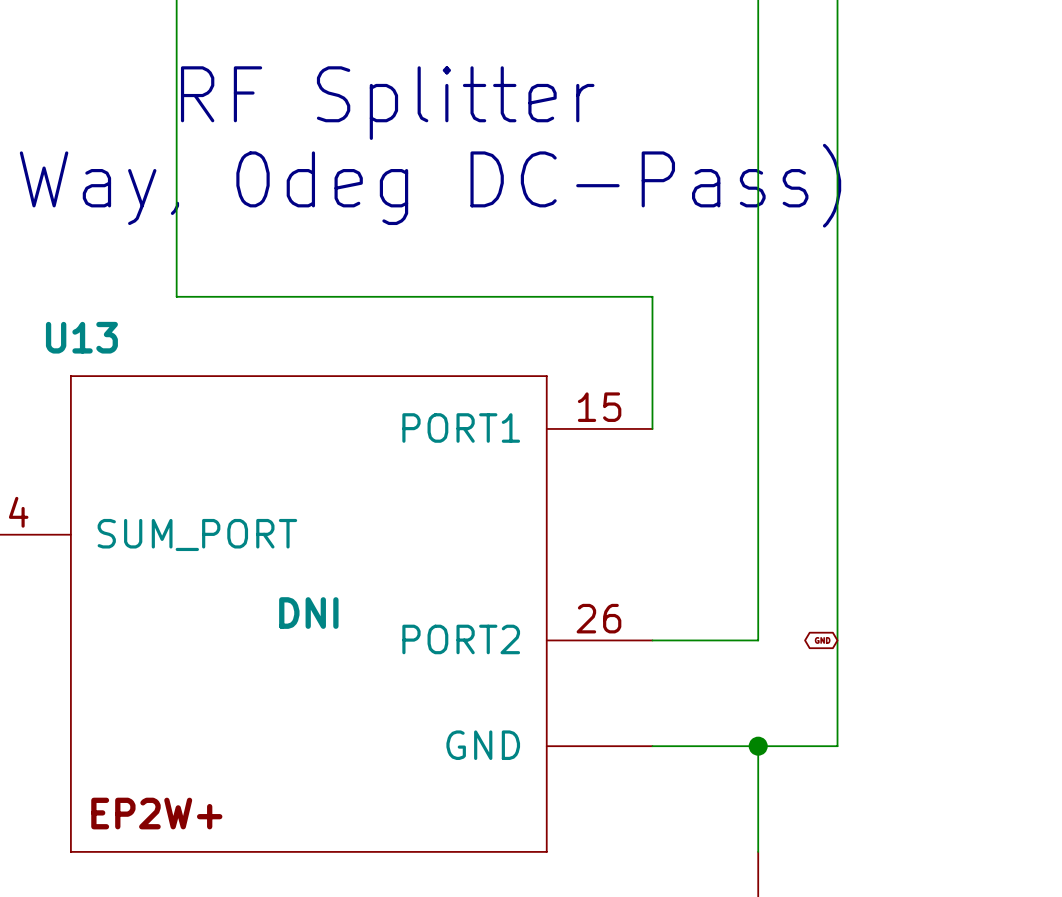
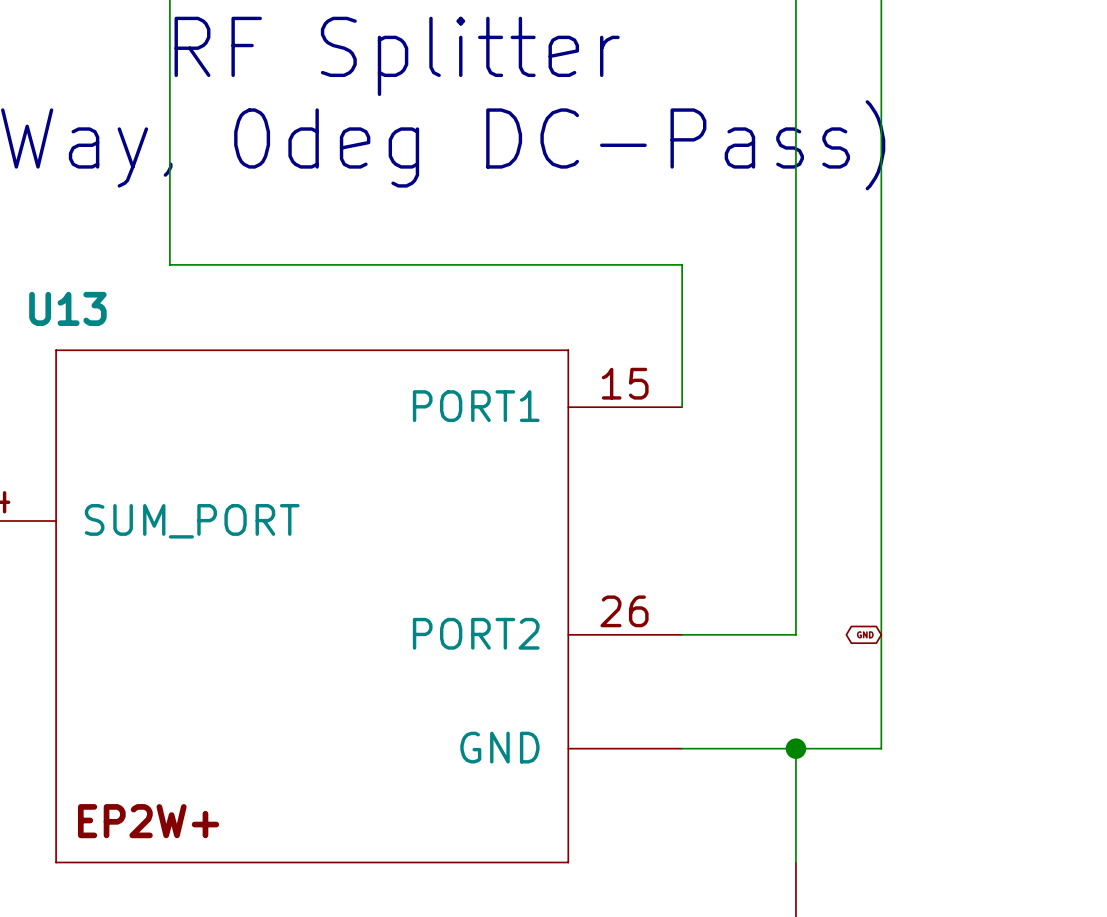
U13 text: DNI (308, 613) -> none

